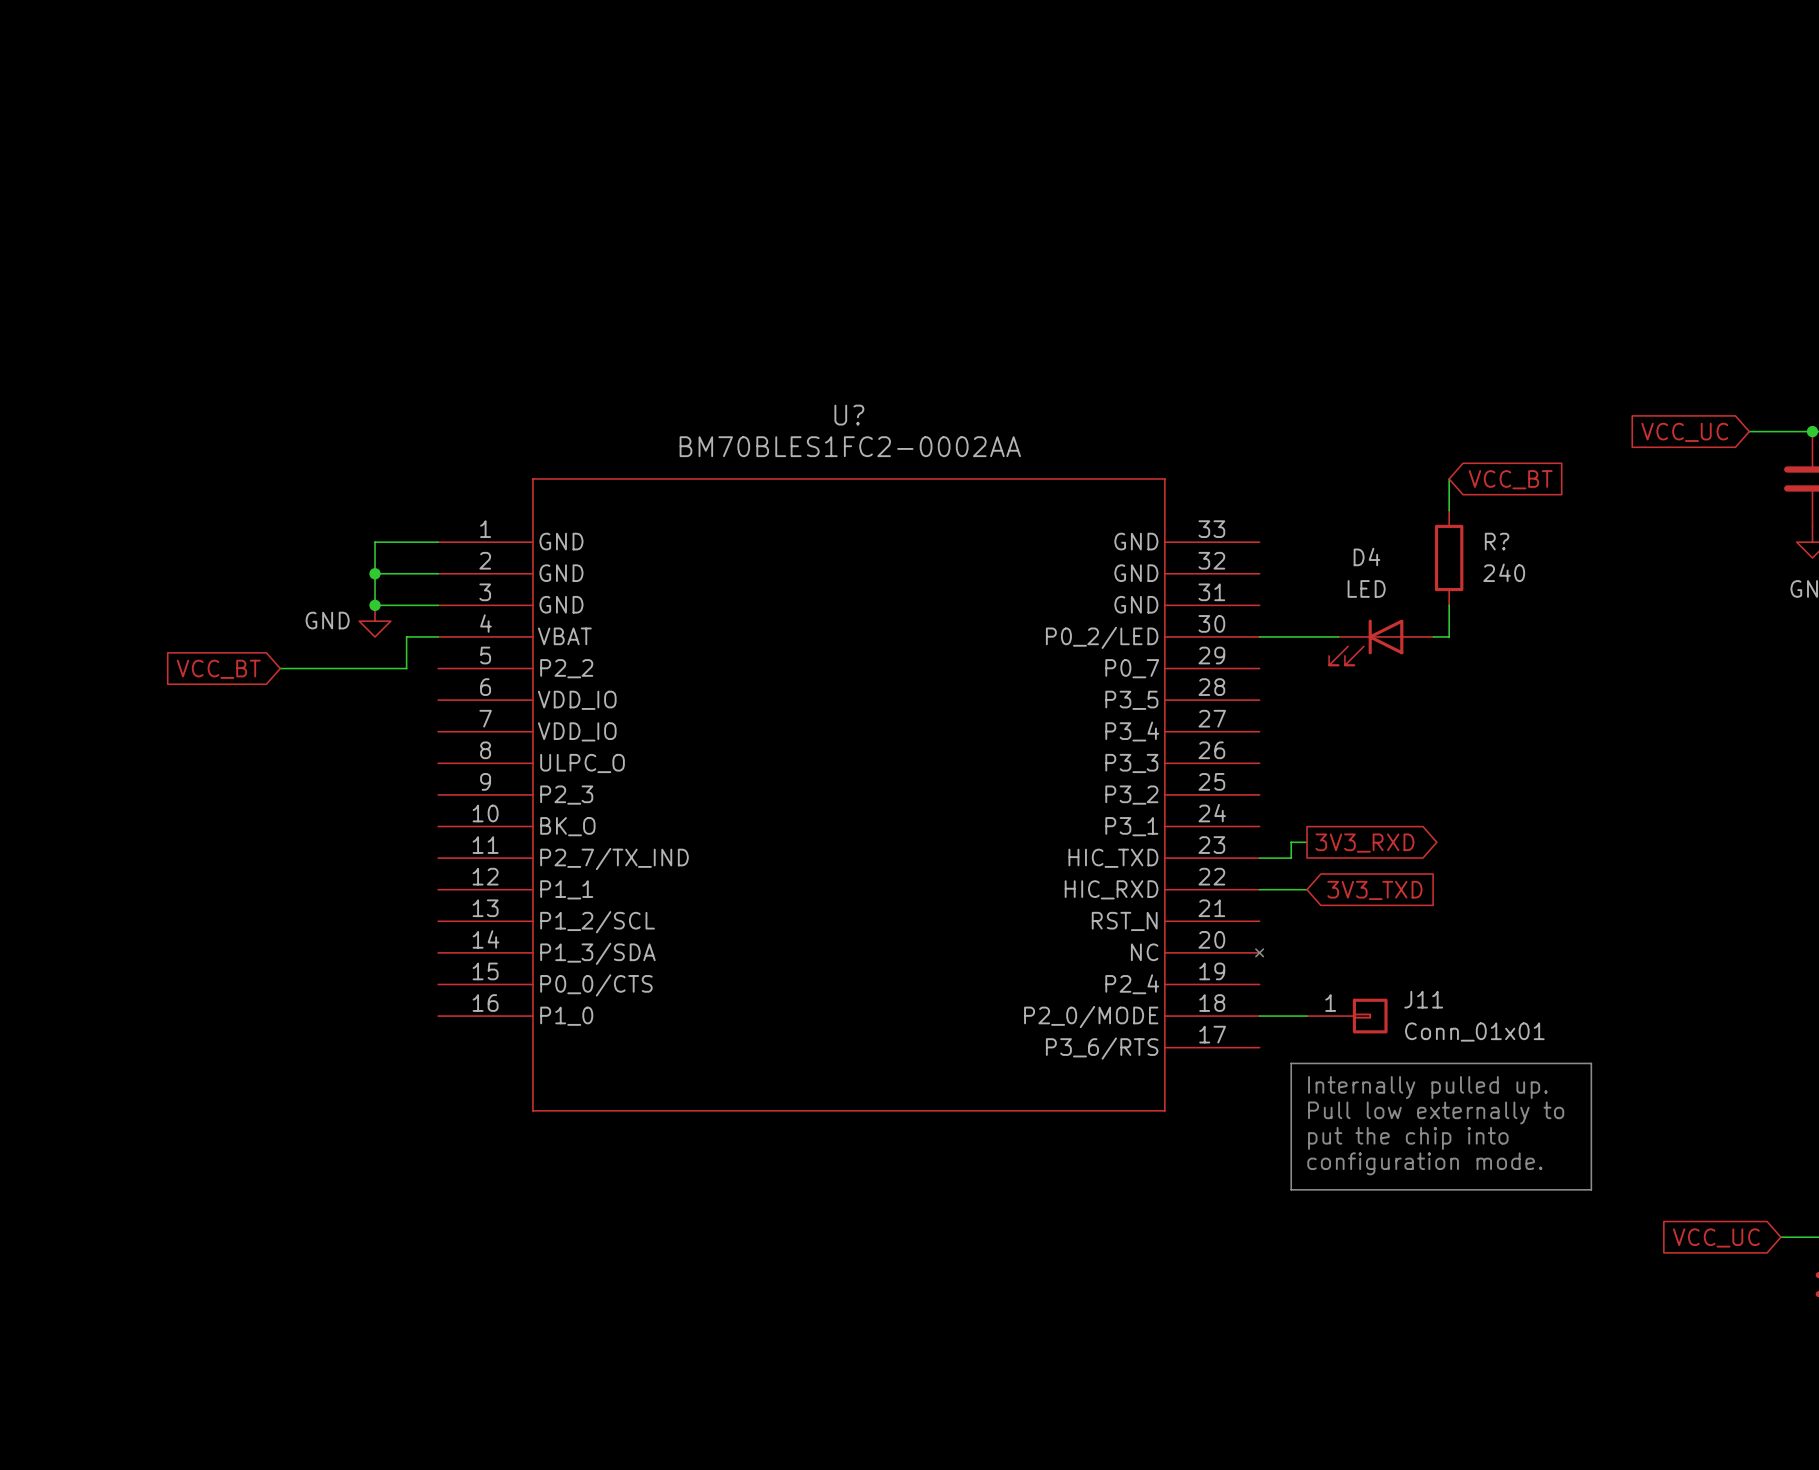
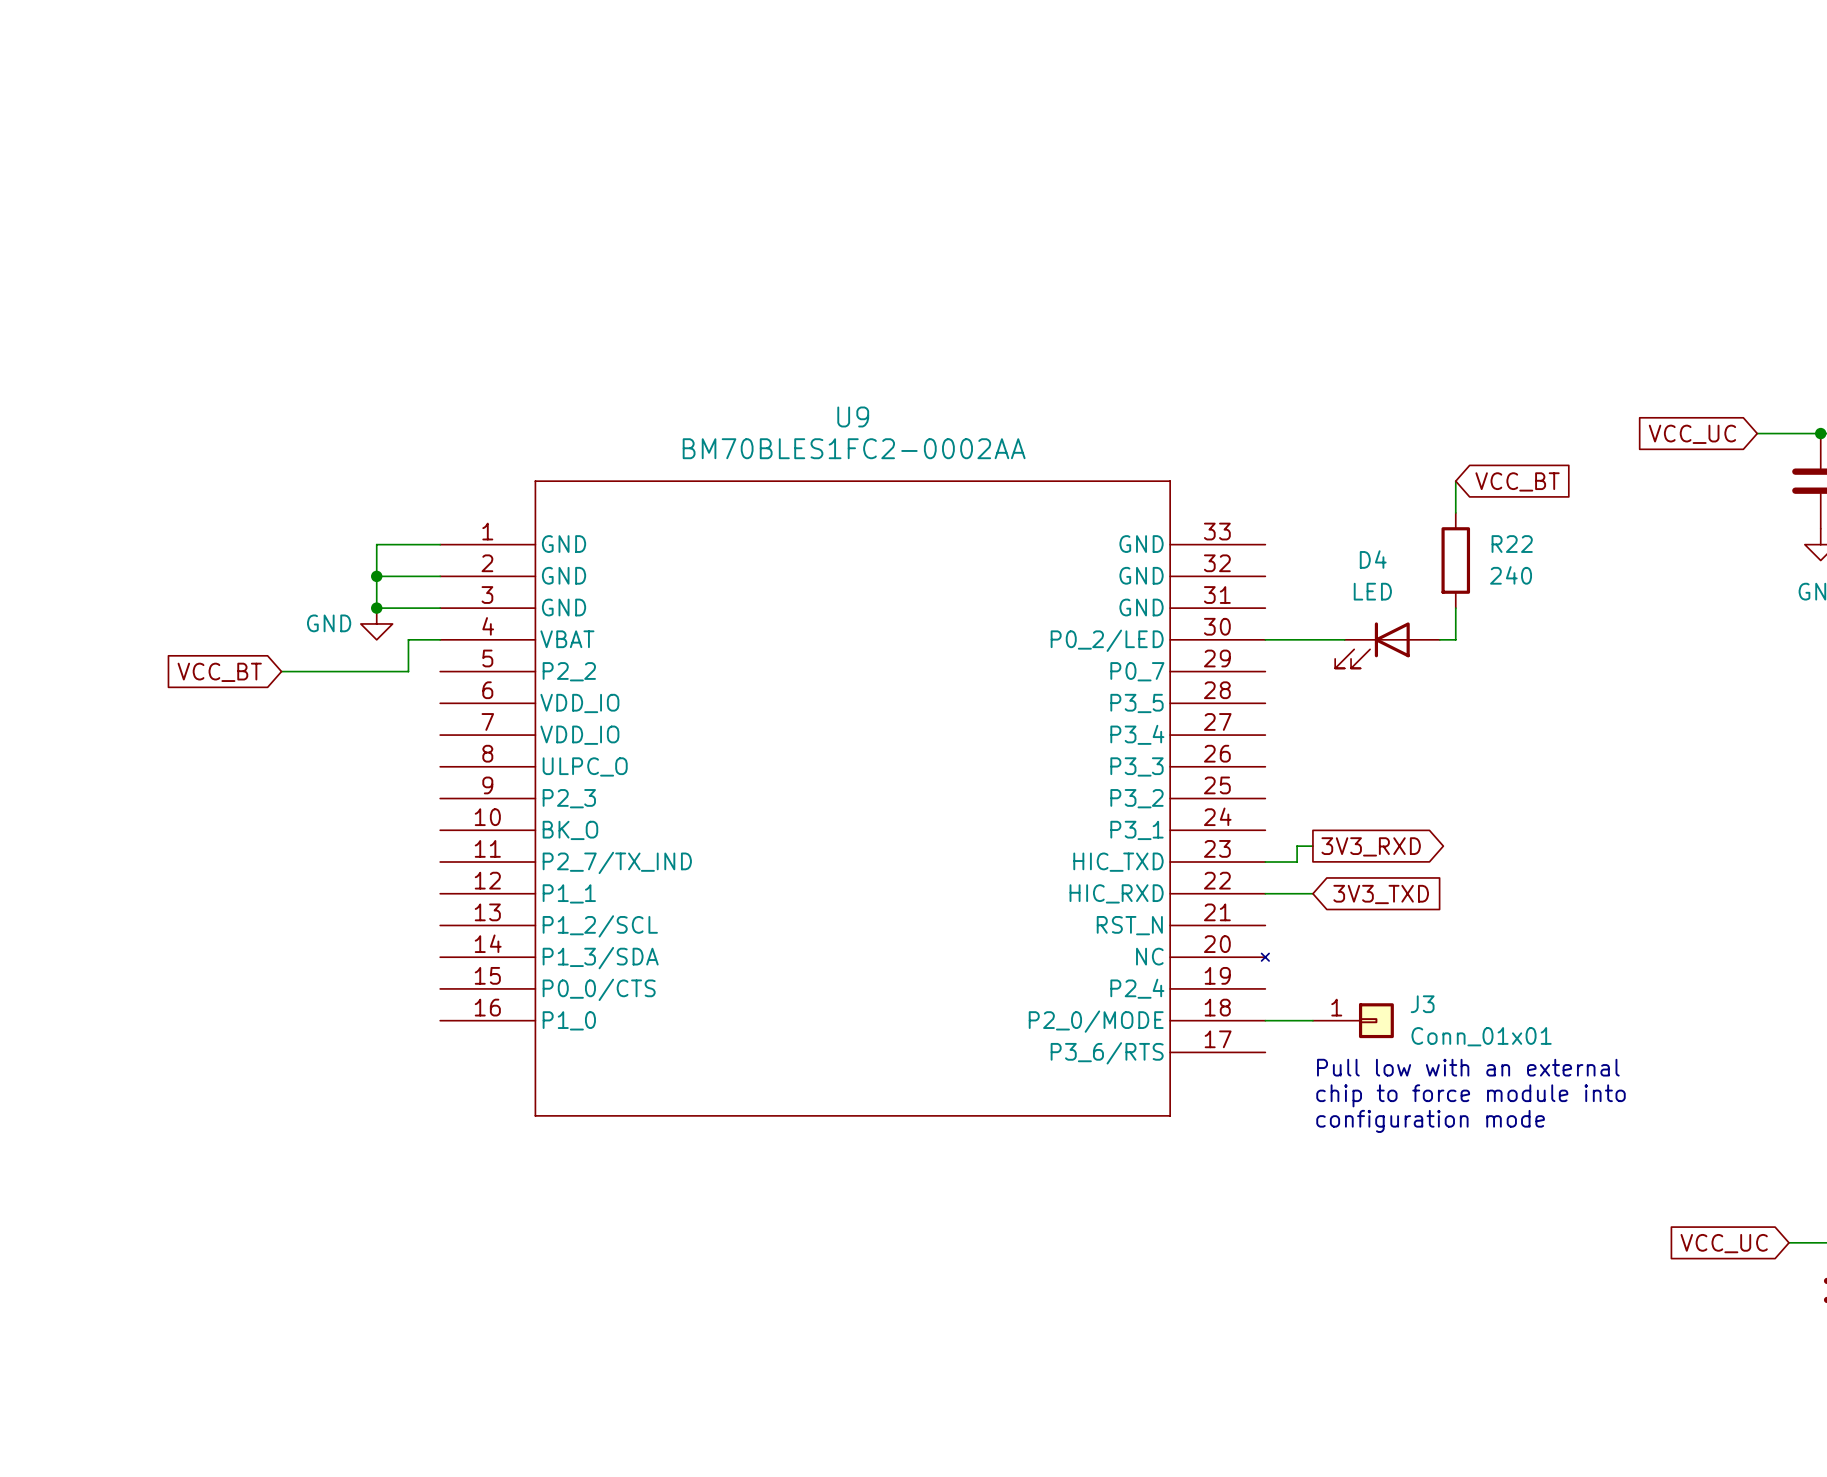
U? name: U? (849, 415) -> U9 (853, 416)
R? name: R? (1497, 541) -> R22 (1512, 544)
J11 name: J11 (1423, 999) -> J3 (1422, 1004)
line: (1291, 1063) (1591, 1063) (1591, 1189) (1291, 1189) (1291, 1063) -> none
text: Internally pulled up. (1427, 1087) -> Pull low with an external (1468, 1067)
text: Pull low externally to (1436, 1112) -> chip to force module into (1470, 1095)
text: put the chip into (1408, 1138) -> configuration mode (1430, 1121)
text: configuration mode. (1424, 1163) -> none

